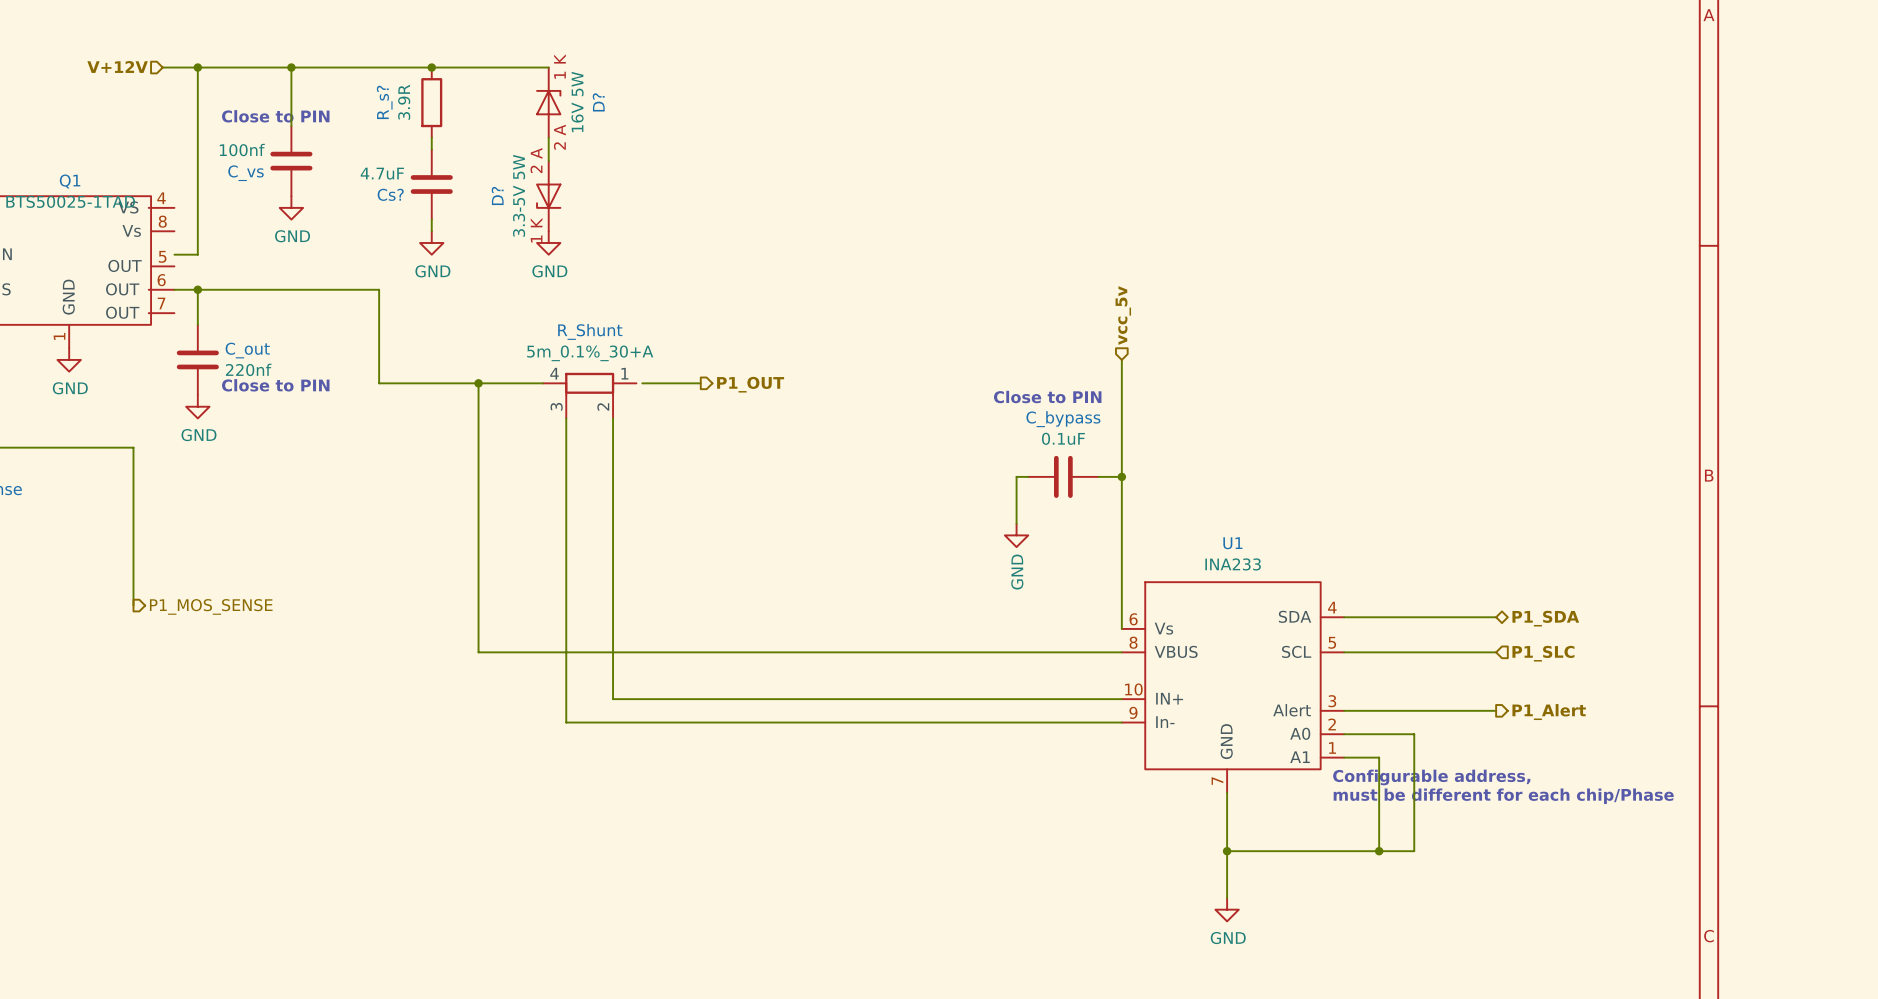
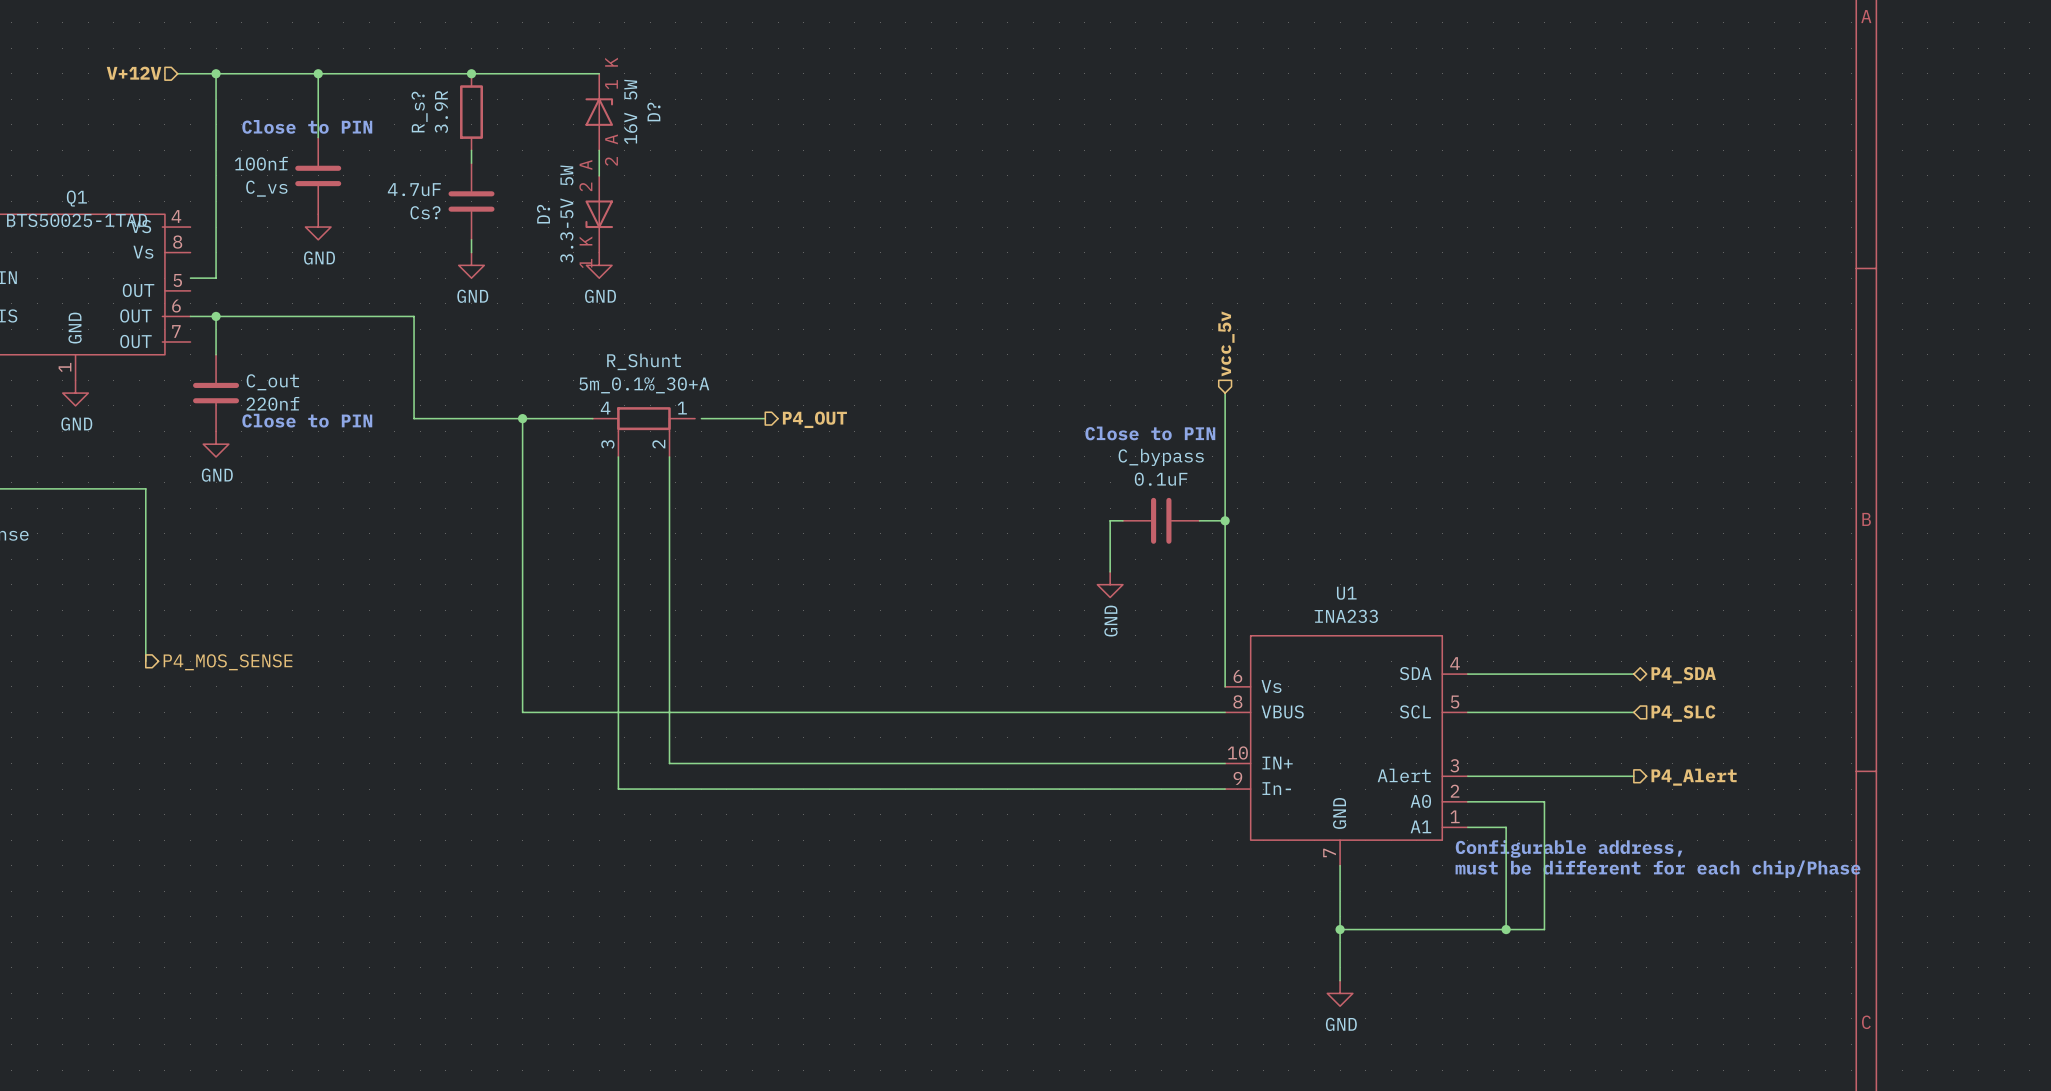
hierarchical label: P1_OUT (750, 384) -> P4_OUT (814, 419)
hierarchical label: P1_MOS_SENSE (211, 606) -> P4_MOS_SENSE (227, 662)
hierarchical label: P1_SDA (1545, 618) -> P4_SDA (1683, 675)
hierarchical label: P1_SLC (1543, 653) -> P4_SLC (1683, 713)
hierarchical label: P1_Alert (1549, 712) -> P4_Alert (1694, 777)

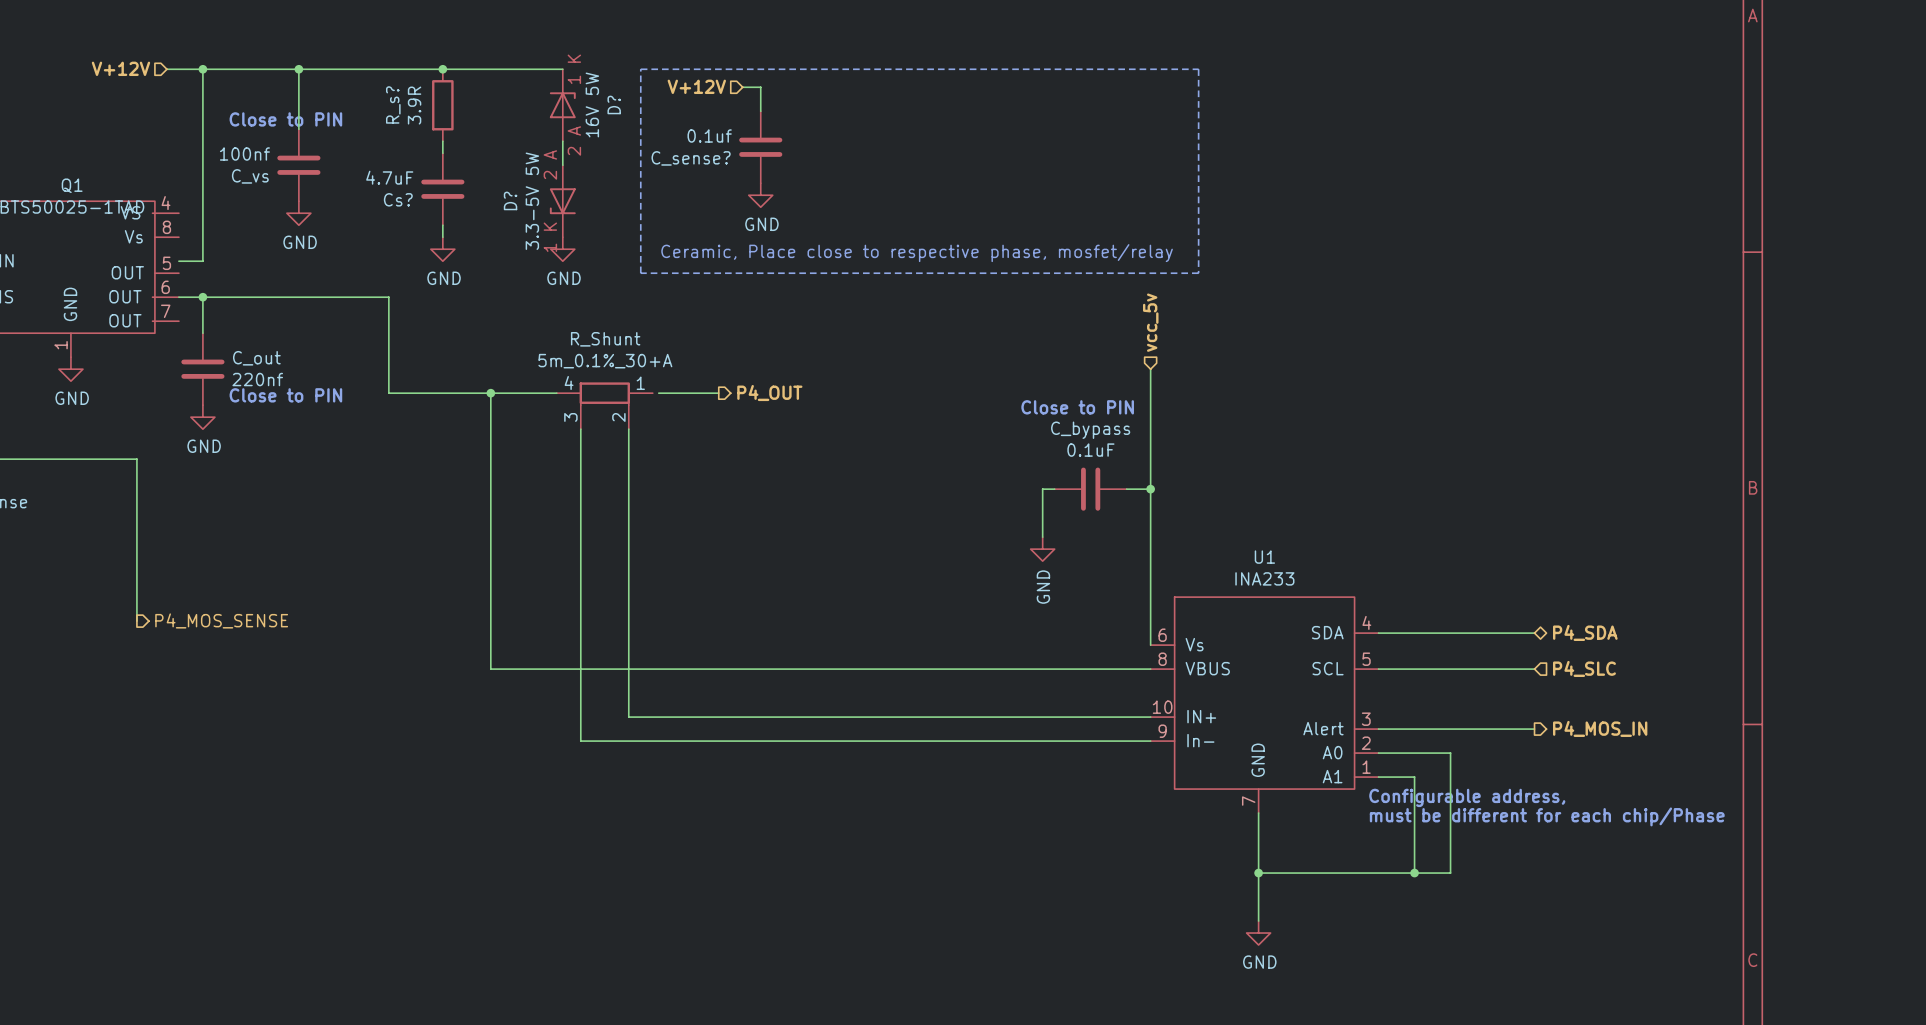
line: none -> (640, 69) (1198, 69) (1198, 273) (640, 273) (640, 69)
hierarchical label: none -> V+12V (696, 86)
wire: none -> (742, 87) (760, 87) (760, 111)
C_sense?: none -> 0.1uf (760, 147)
power symbol: none -> GND (760, 195)
text: none -> Ceramic, Place close to respective phase, mosfet/relay (917, 253)
hierarchical label: P4_Alert (1694, 777) -> P4_MOS_IN (1600, 728)

